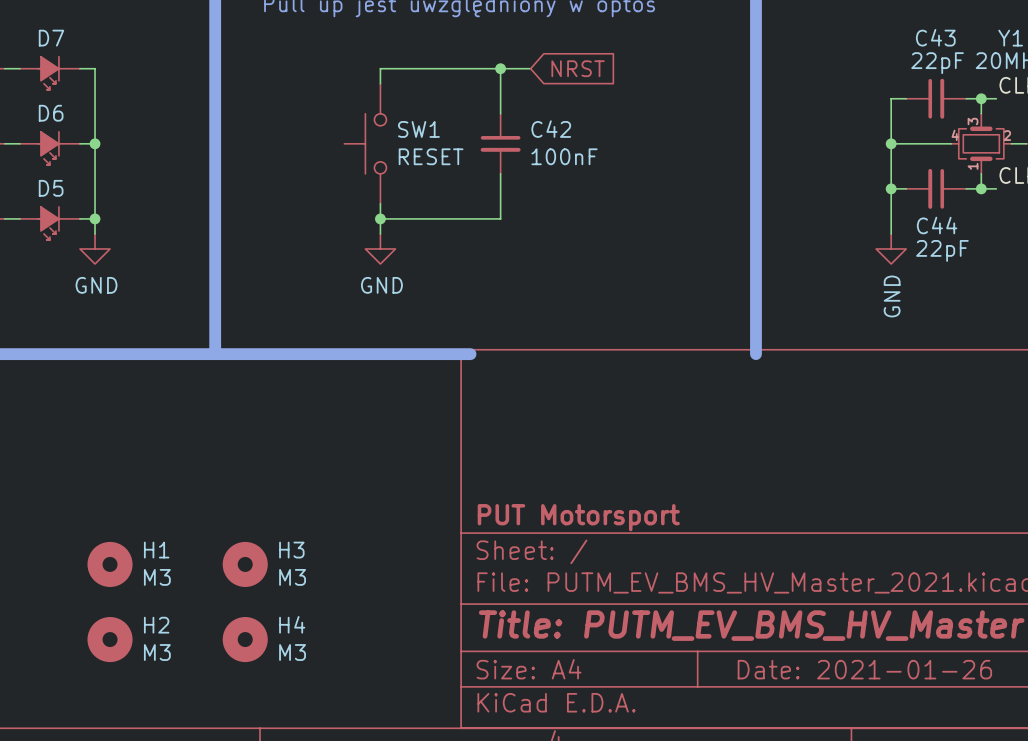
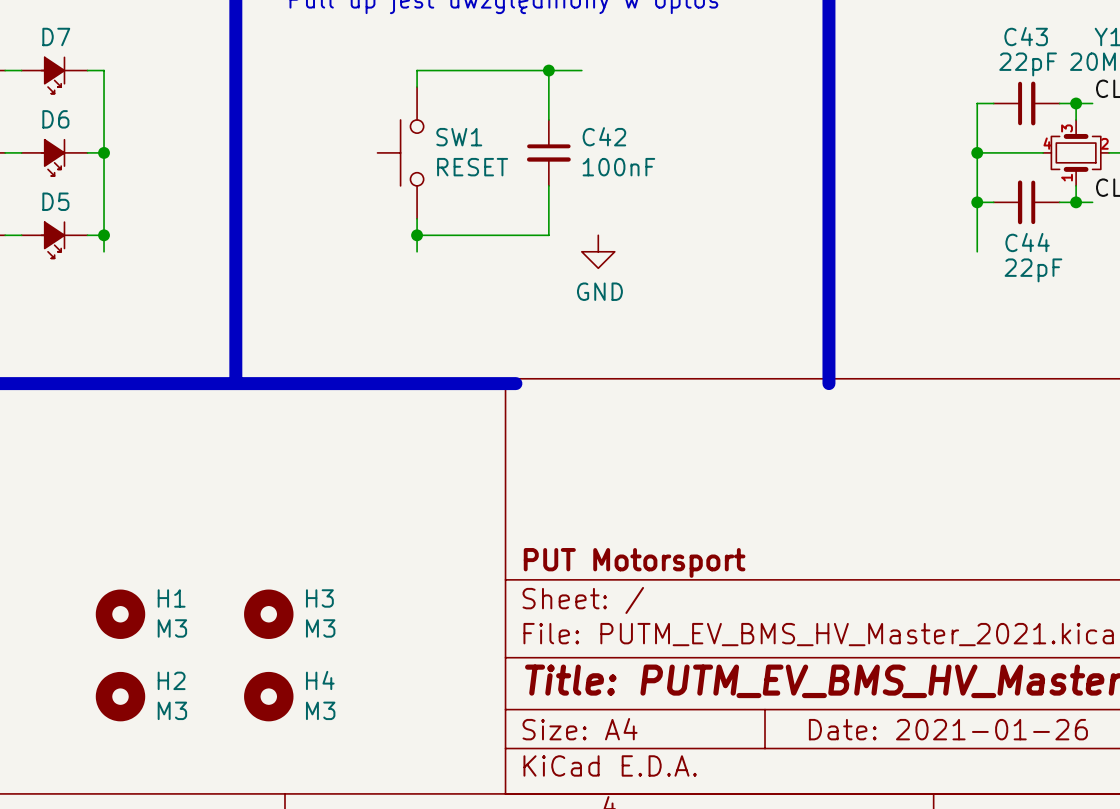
global label: NRST (578, 68) -> none
power symbol: GND (95, 248) -> none
power symbol position: GND (380, 248) -> GND (598, 251)
power symbol: GND (891, 248) -> none

